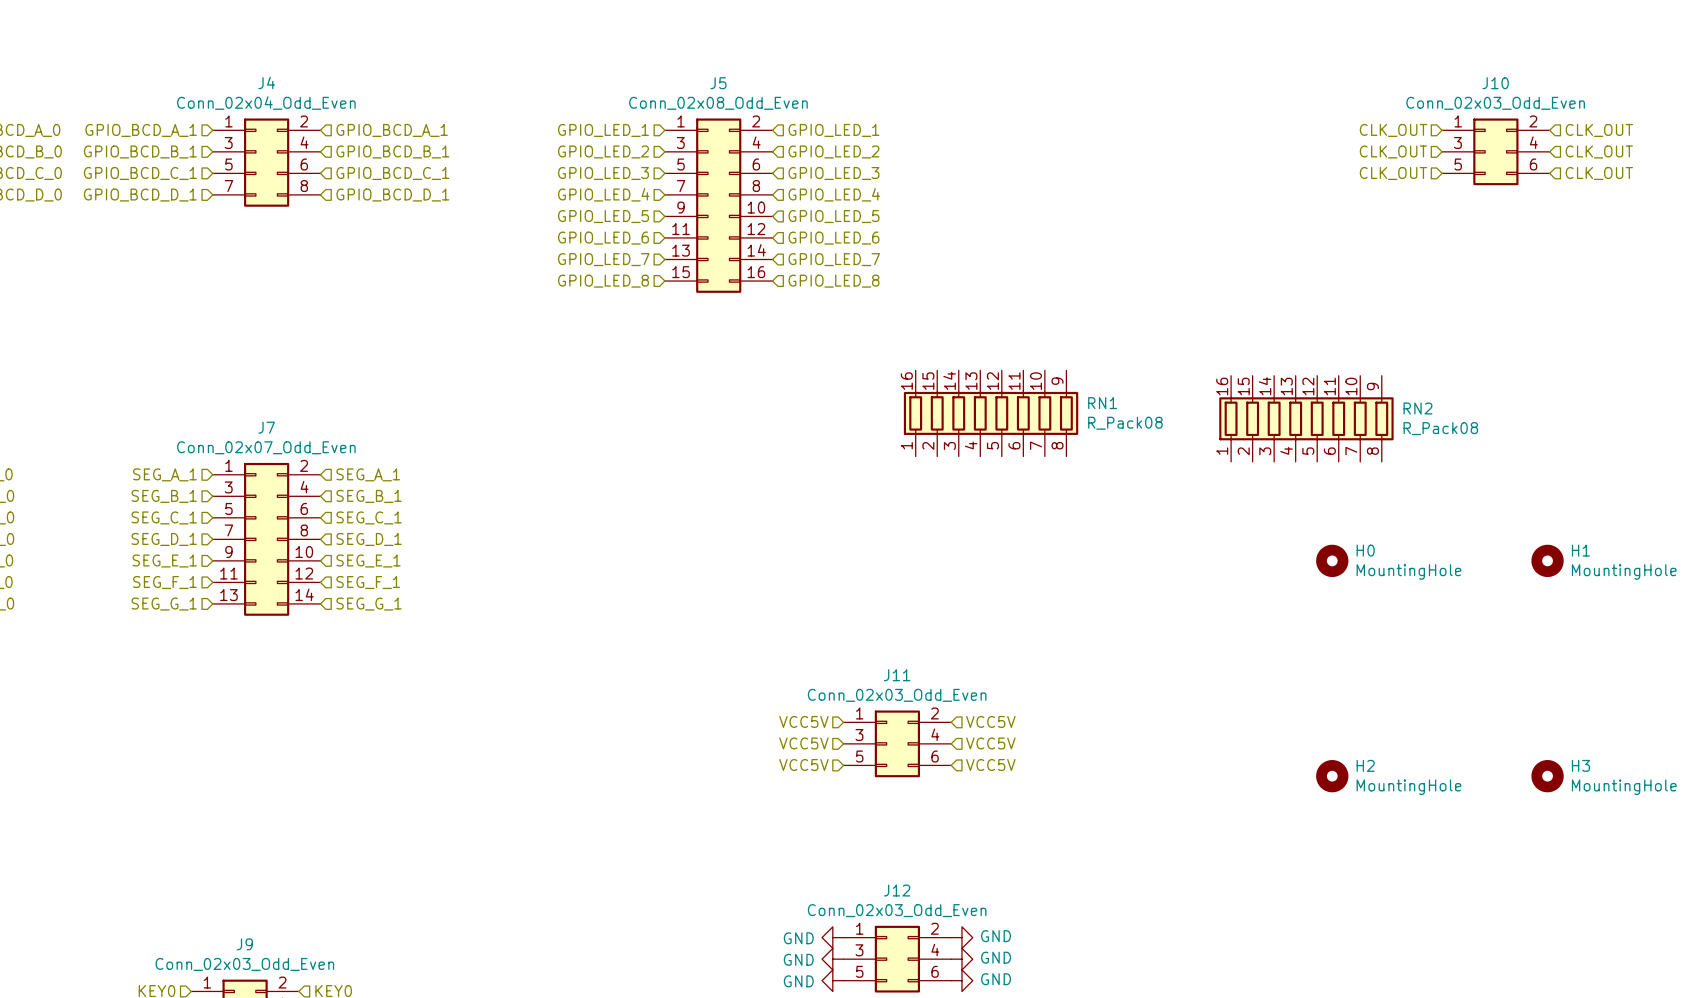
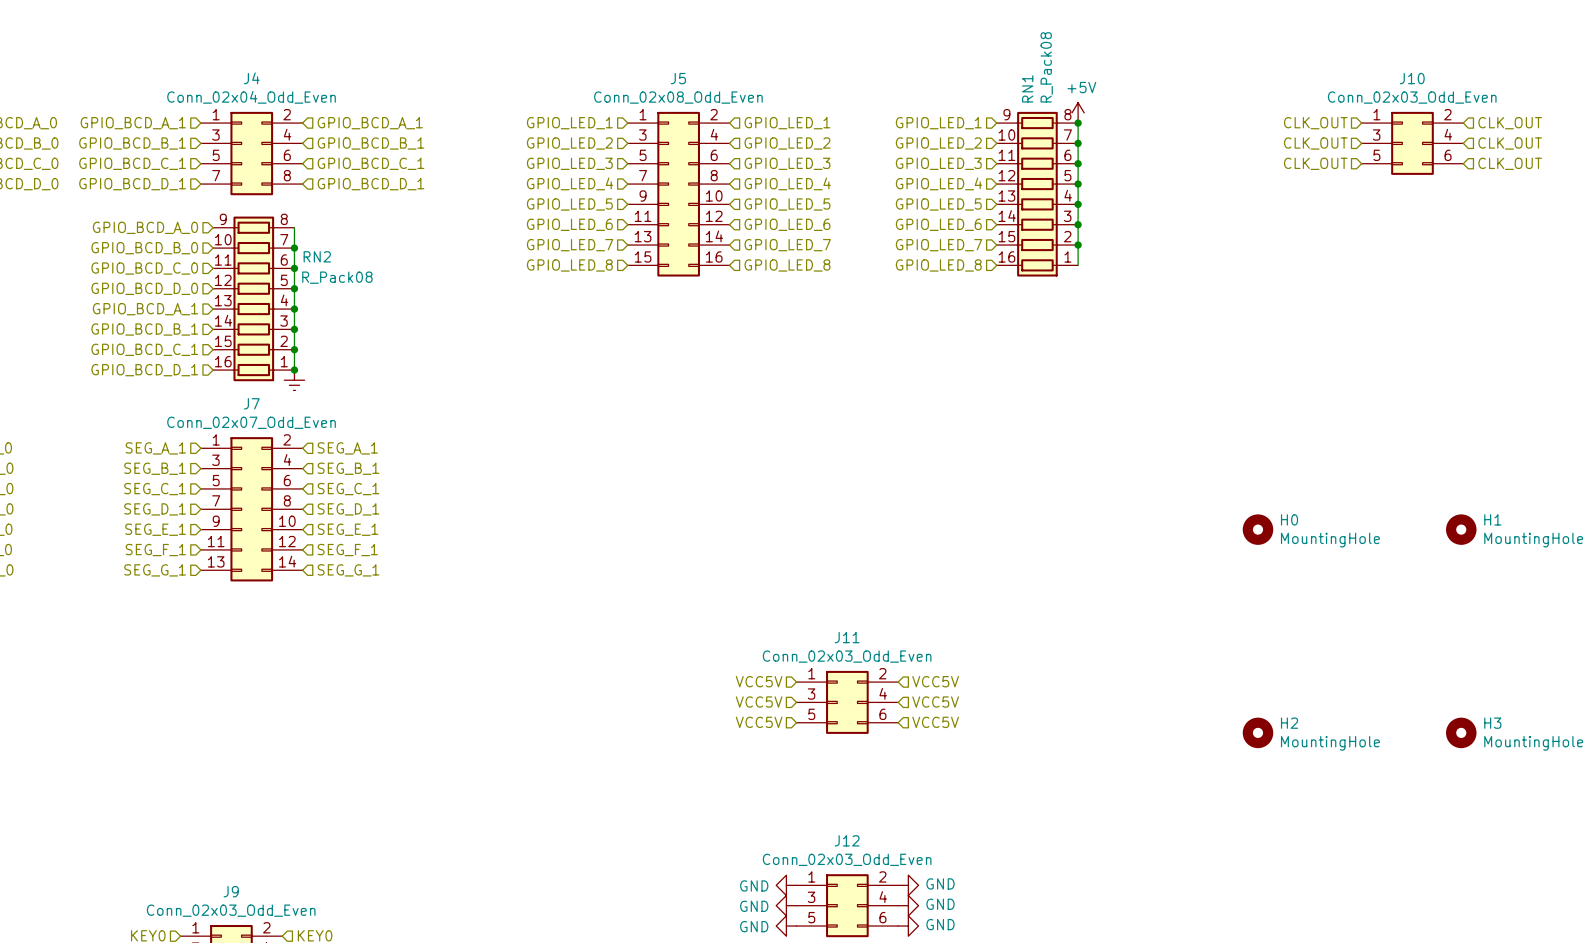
power symbol: none -> +5V (1078, 112)
hierarchical label: none -> GPIO_LED_1 (938, 123)
wire: none -> (1078, 123) (1078, 265)
junction: none -> (1078, 123)
hierarchical label: none -> GPIO_LED_2 (938, 143)
junction: none -> (1078, 143)
hierarchical label: none -> GPIO_LED_3 (938, 163)
junction: none -> (1078, 163)
hierarchical label: none -> GPIO_LED_4 (939, 183)
junction: none -> (1078, 184)
hierarchical label: none -> GPIO_LED_5 (938, 204)
junction: none -> (1078, 204)
junction: none -> (1078, 224)
hierarchical label: none -> GPIO_LED_6 (938, 224)
hierarchical label: none -> GPIO_BCD_A_0 (145, 227)
wire: none -> (294, 227) (294, 370)
hierarchical label: none -> GPIO_LED_7 (939, 245)
junction: none -> (1078, 245)
hierarchical label: none -> GPIO_BCD_B_0 (144, 248)
junction: none -> (294, 248)
hierarchical label: none -> GPIO_LED_8 (938, 265)
hierarchical label: none -> GPIO_BCD_C_0 (144, 268)
junction: none -> (294, 268)
hierarchical label: none -> GPIO_BCD_D_0 (144, 288)
junction: none -> (294, 288)
hierarchical label: none -> GPIO_BCD_A_1 (145, 309)
junction: none -> (294, 309)
hierarchical label: none -> GPIO_BCD_B_1 (144, 329)
junction: none -> (294, 329)
hierarchical label: none -> GPIO_BCD_C_1 (144, 349)
junction: none -> (294, 349)
junction: none -> (294, 370)
hierarchical label: none -> GPIO_BCD_D_1 (144, 370)
power symbol: none -> (294, 380)
RN2 name position: RN2 (1417, 408) -> RN2 (317, 256)
RN1 rotation: 0° (991, 413) -> 90° counterclockwise (1037, 194)
RN1 position: (991, 413) -> (1037, 194)
RN2 rotation: 0° (1306, 418) -> 90° counterclockwise (253, 298)
RN2 position: (1306, 418) -> (253, 298)
RN2 value position: R_Pack08 (1440, 428) -> R_Pack08 (337, 277)

